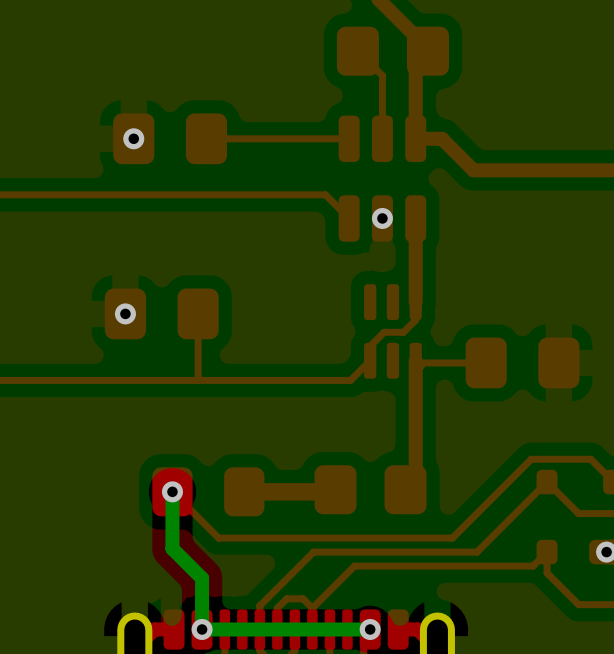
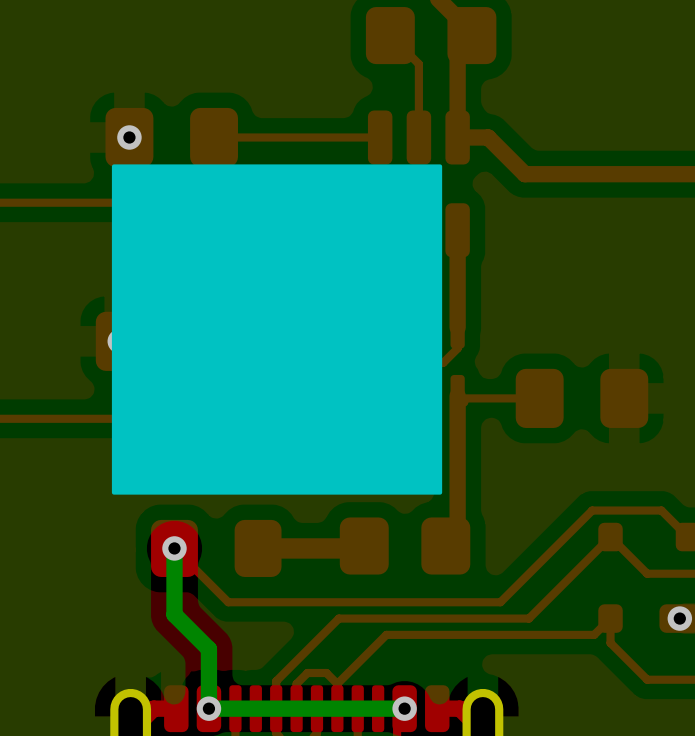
drawing: none -> [111, 164, 443, 495]

